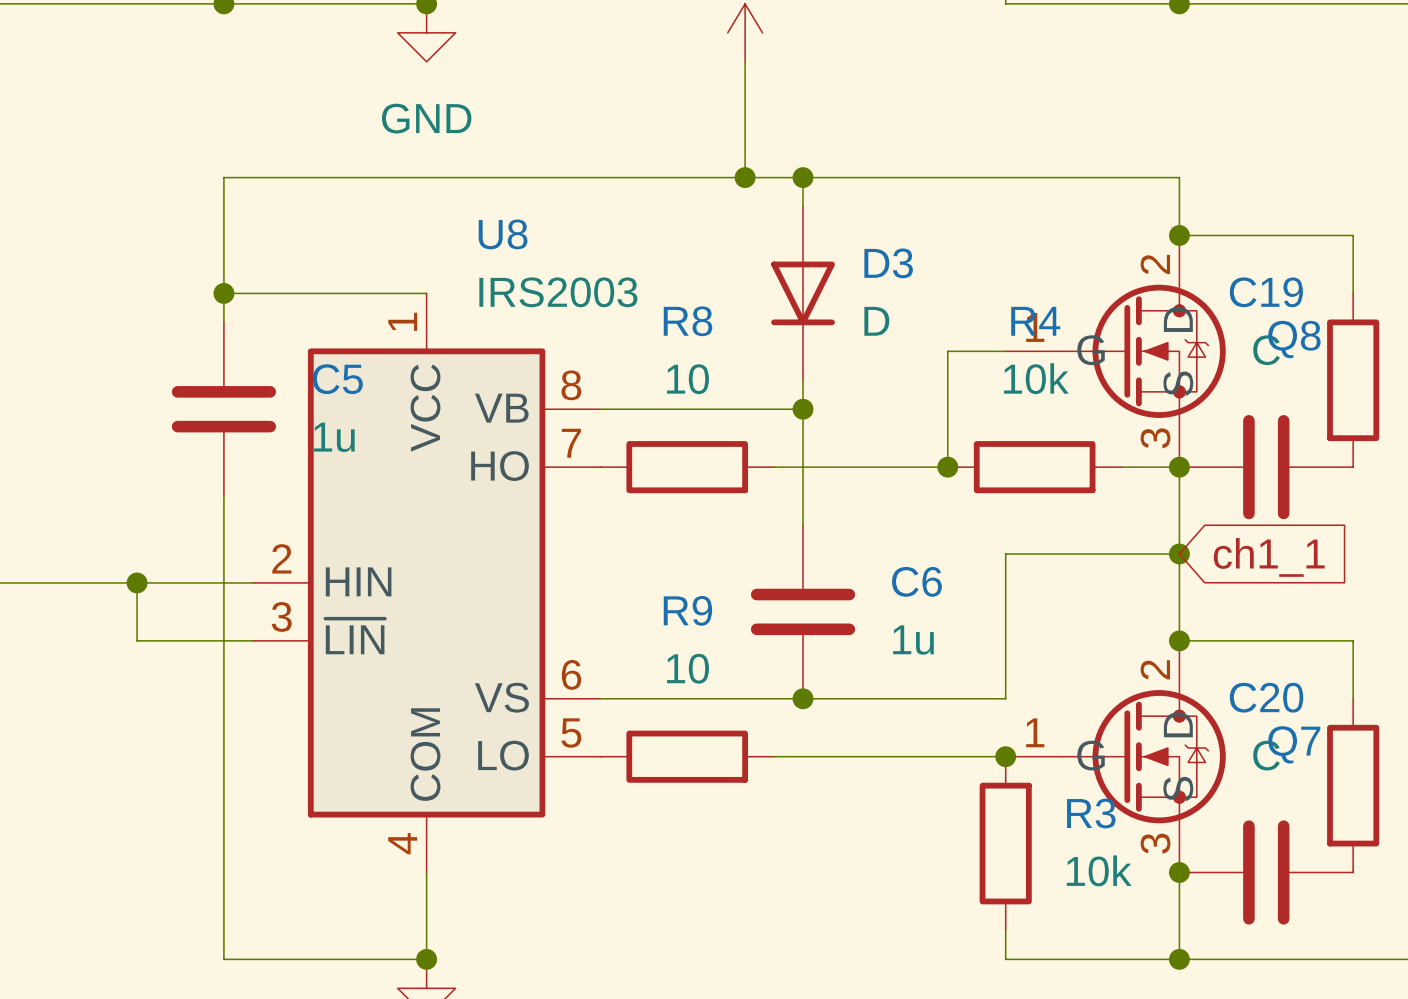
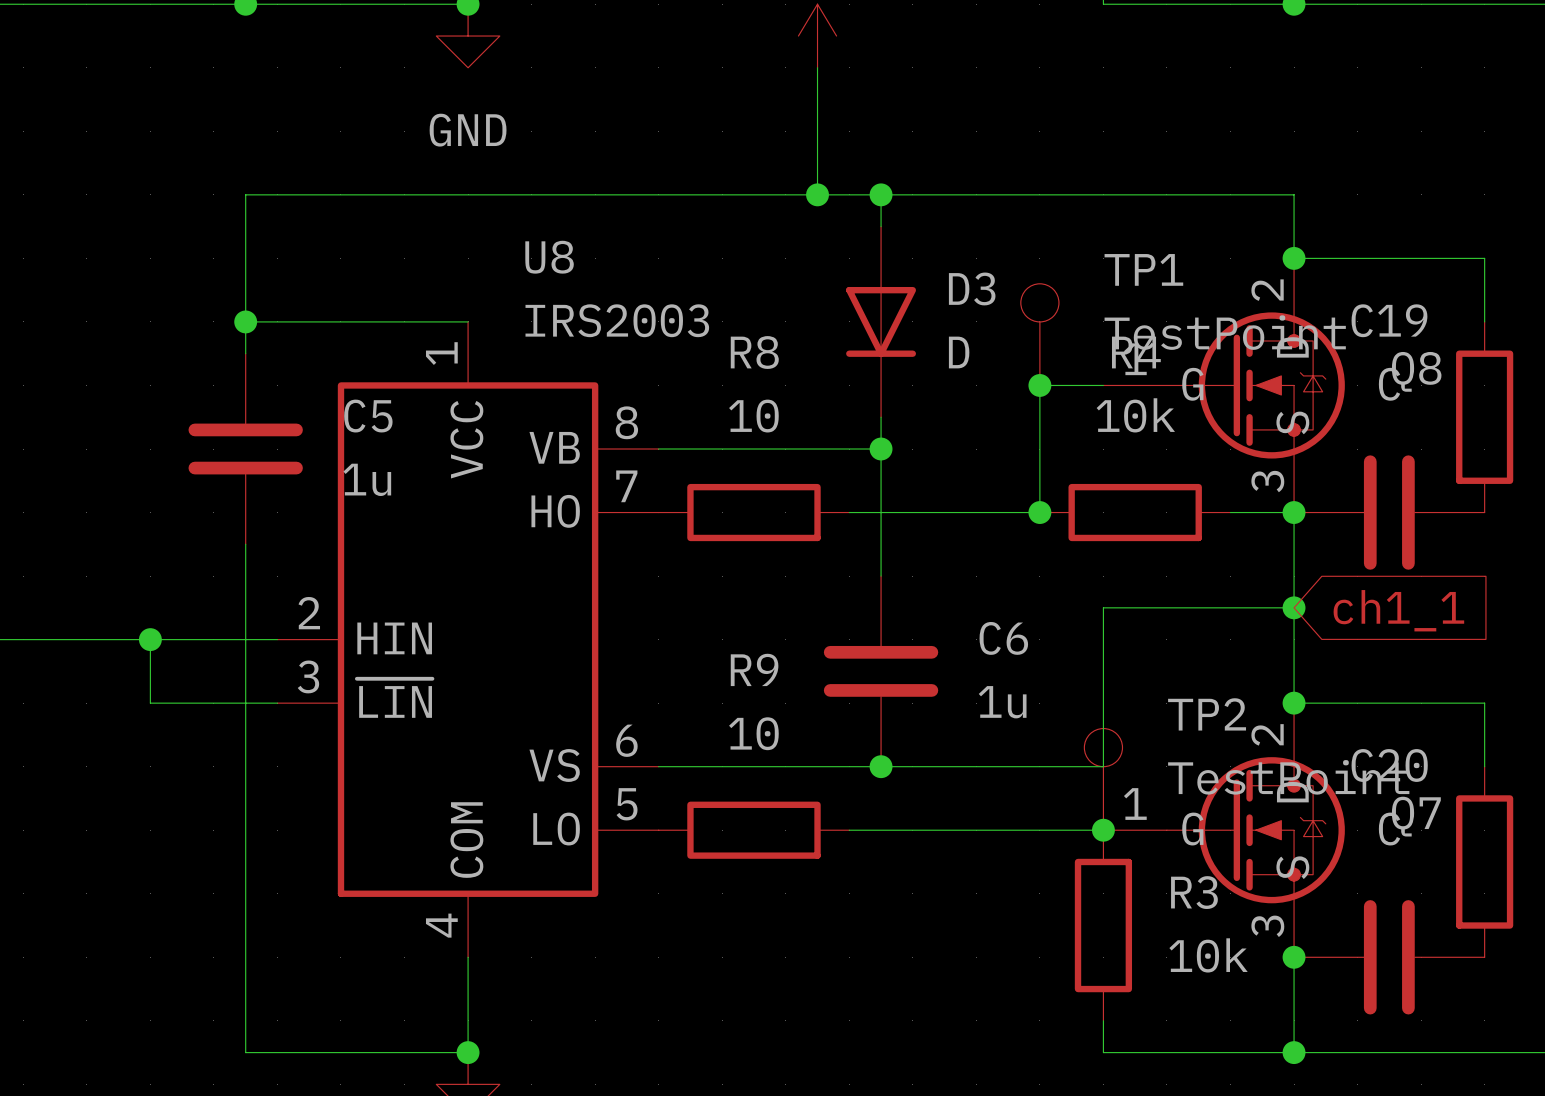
TP1: none -> TestPoint (1039, 334)
junction: none -> (1039, 385)
TP2: none -> TestPoint (1103, 779)

